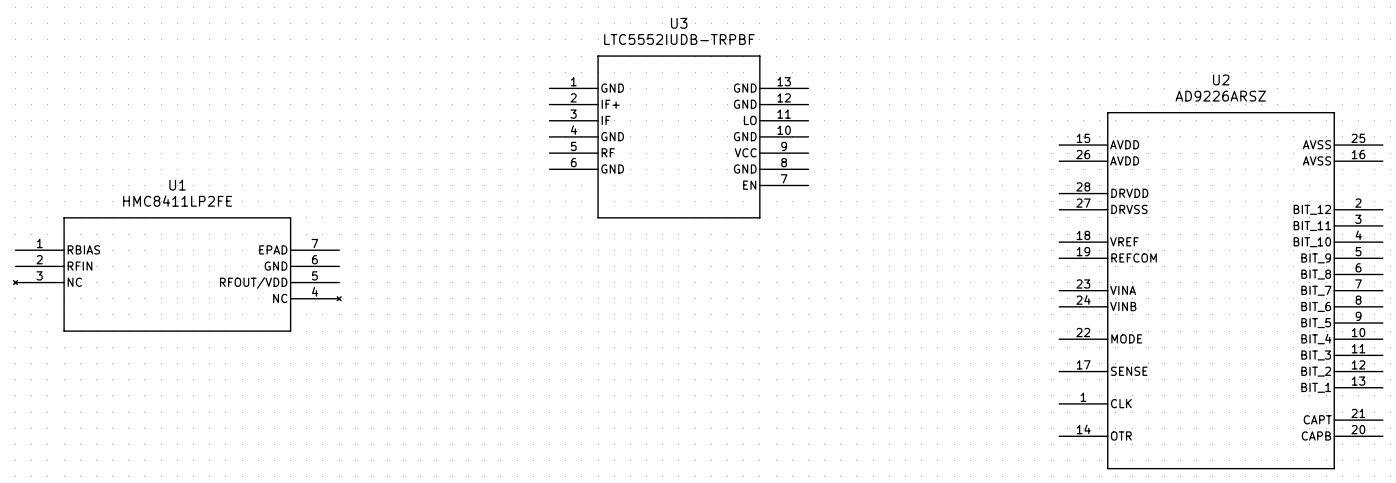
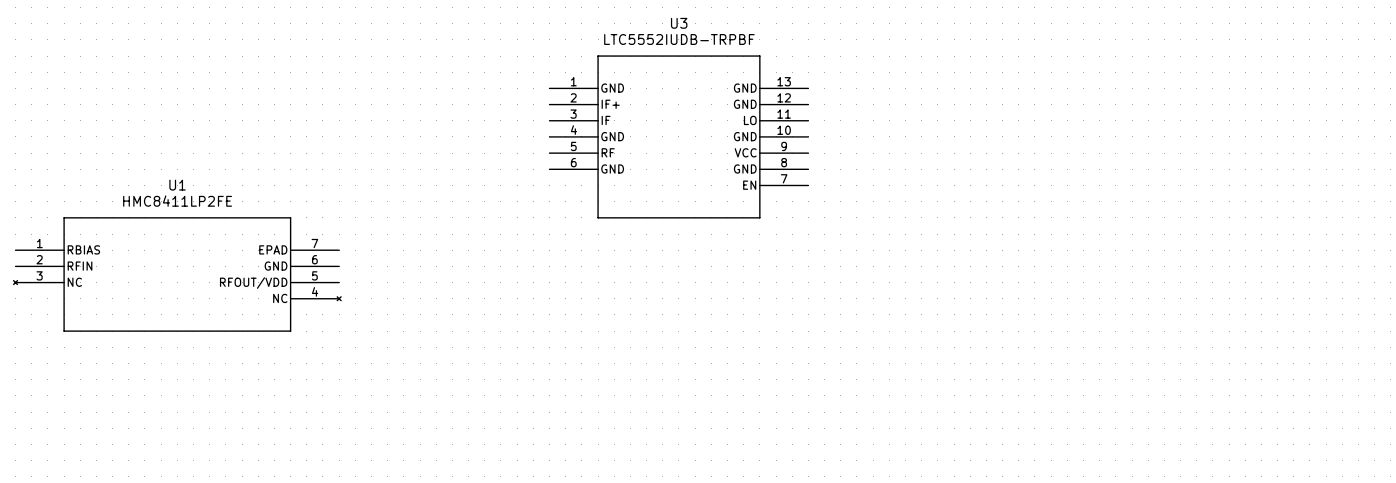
U2: AD9226ARSZ (1221, 290) -> none

